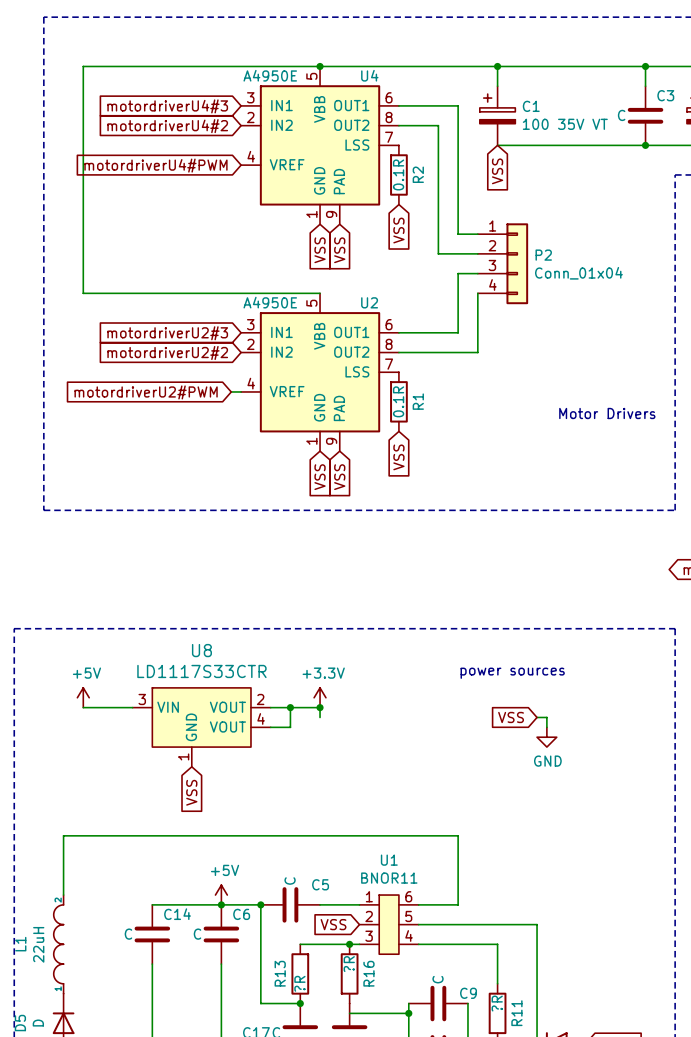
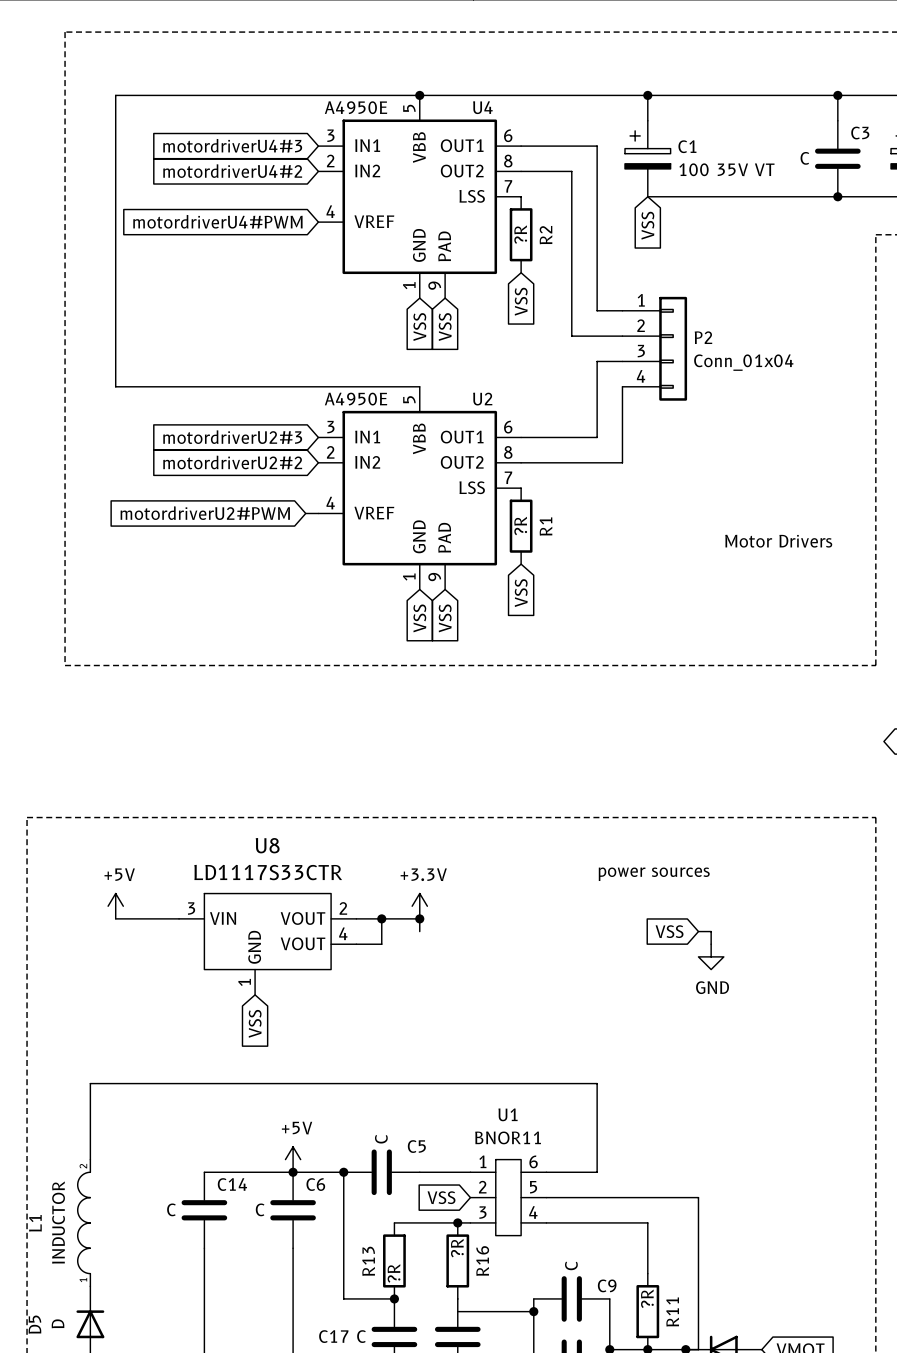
R2 value: 0.1R (398, 174) -> ?R (520, 234)
R1 value: 0.1R (398, 401) -> ?R (520, 525)
L1 value: 22uH (38, 944) -> INDUCTOR (58, 1222)

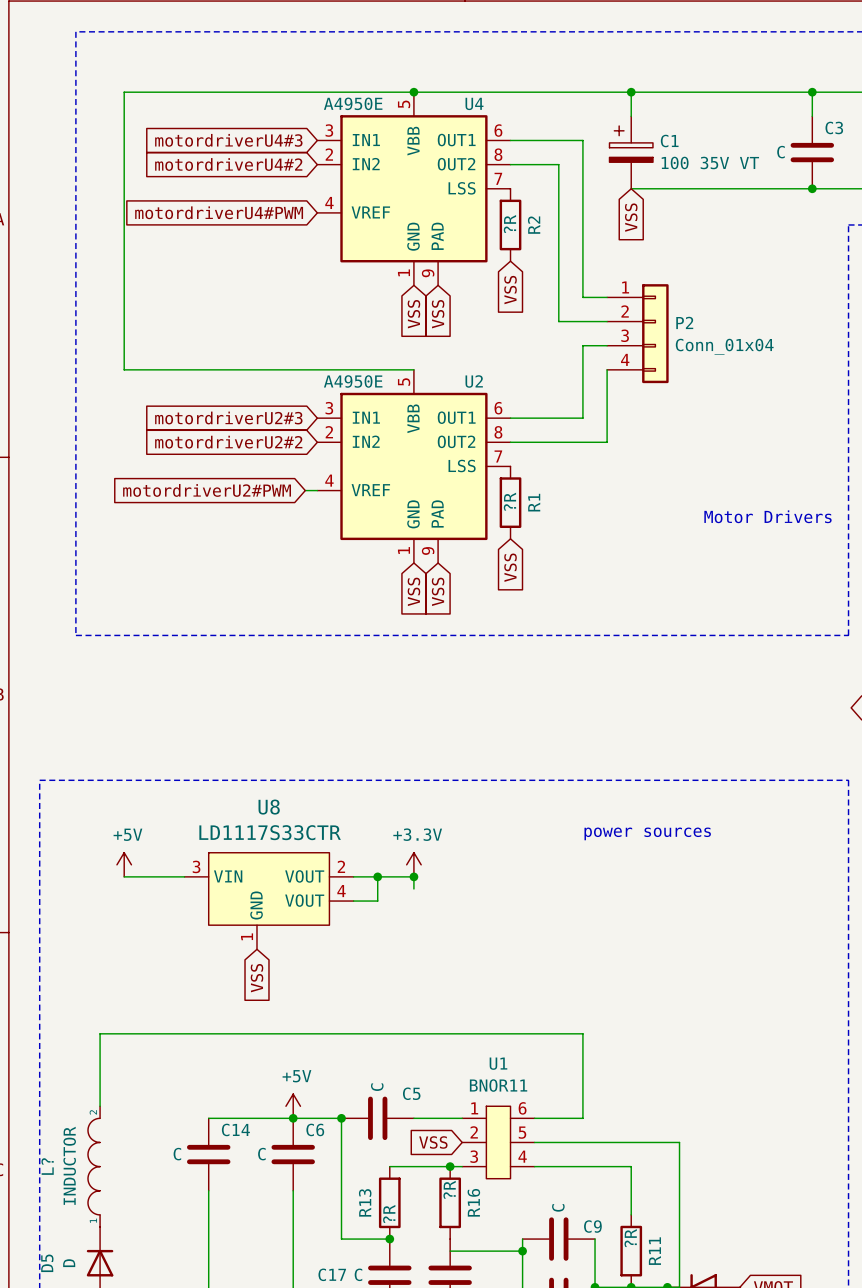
global label: VSS (669, 931) -> none
wire: (698, 931) (711, 931) (711, 944) -> none
power symbol: GND (711, 956) -> none
L1 name: L1 (35, 1223) -> L? (47, 1166)

